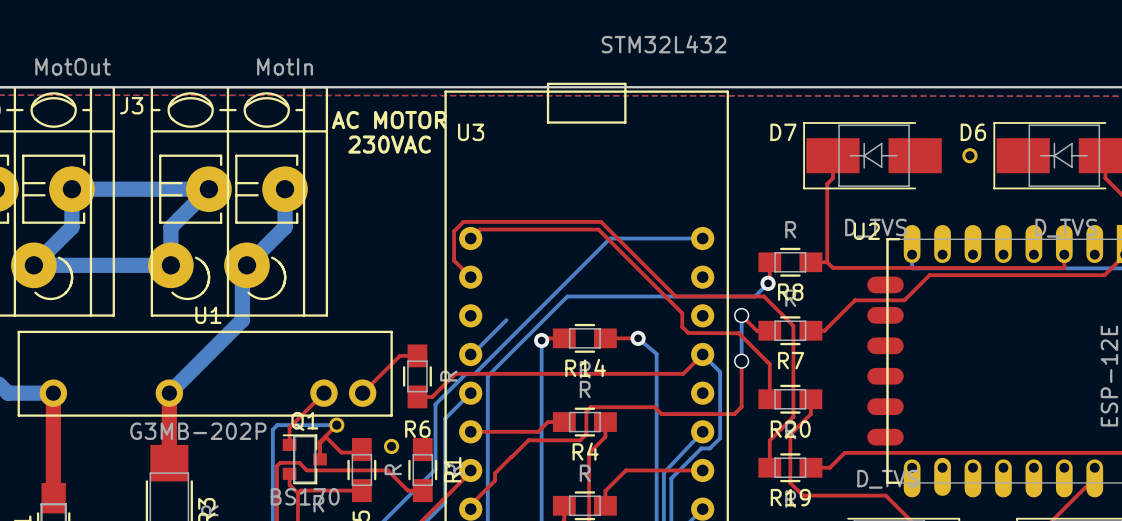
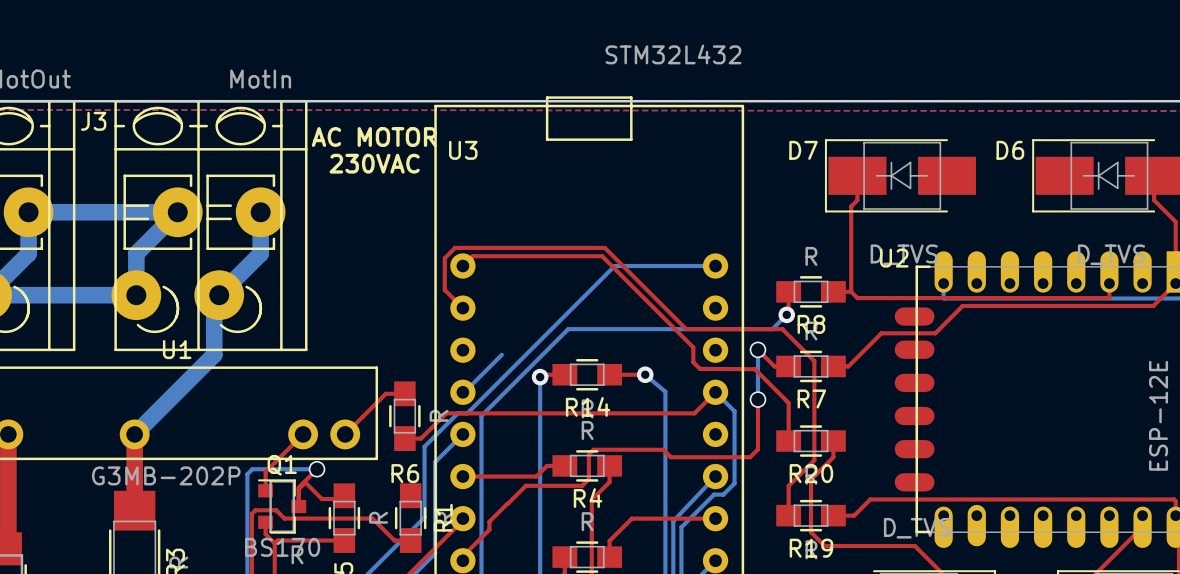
part: (969, 155) -> none
part: (336, 425) -> none
via: none -> (317, 469)
part: (391, 446) -> none

